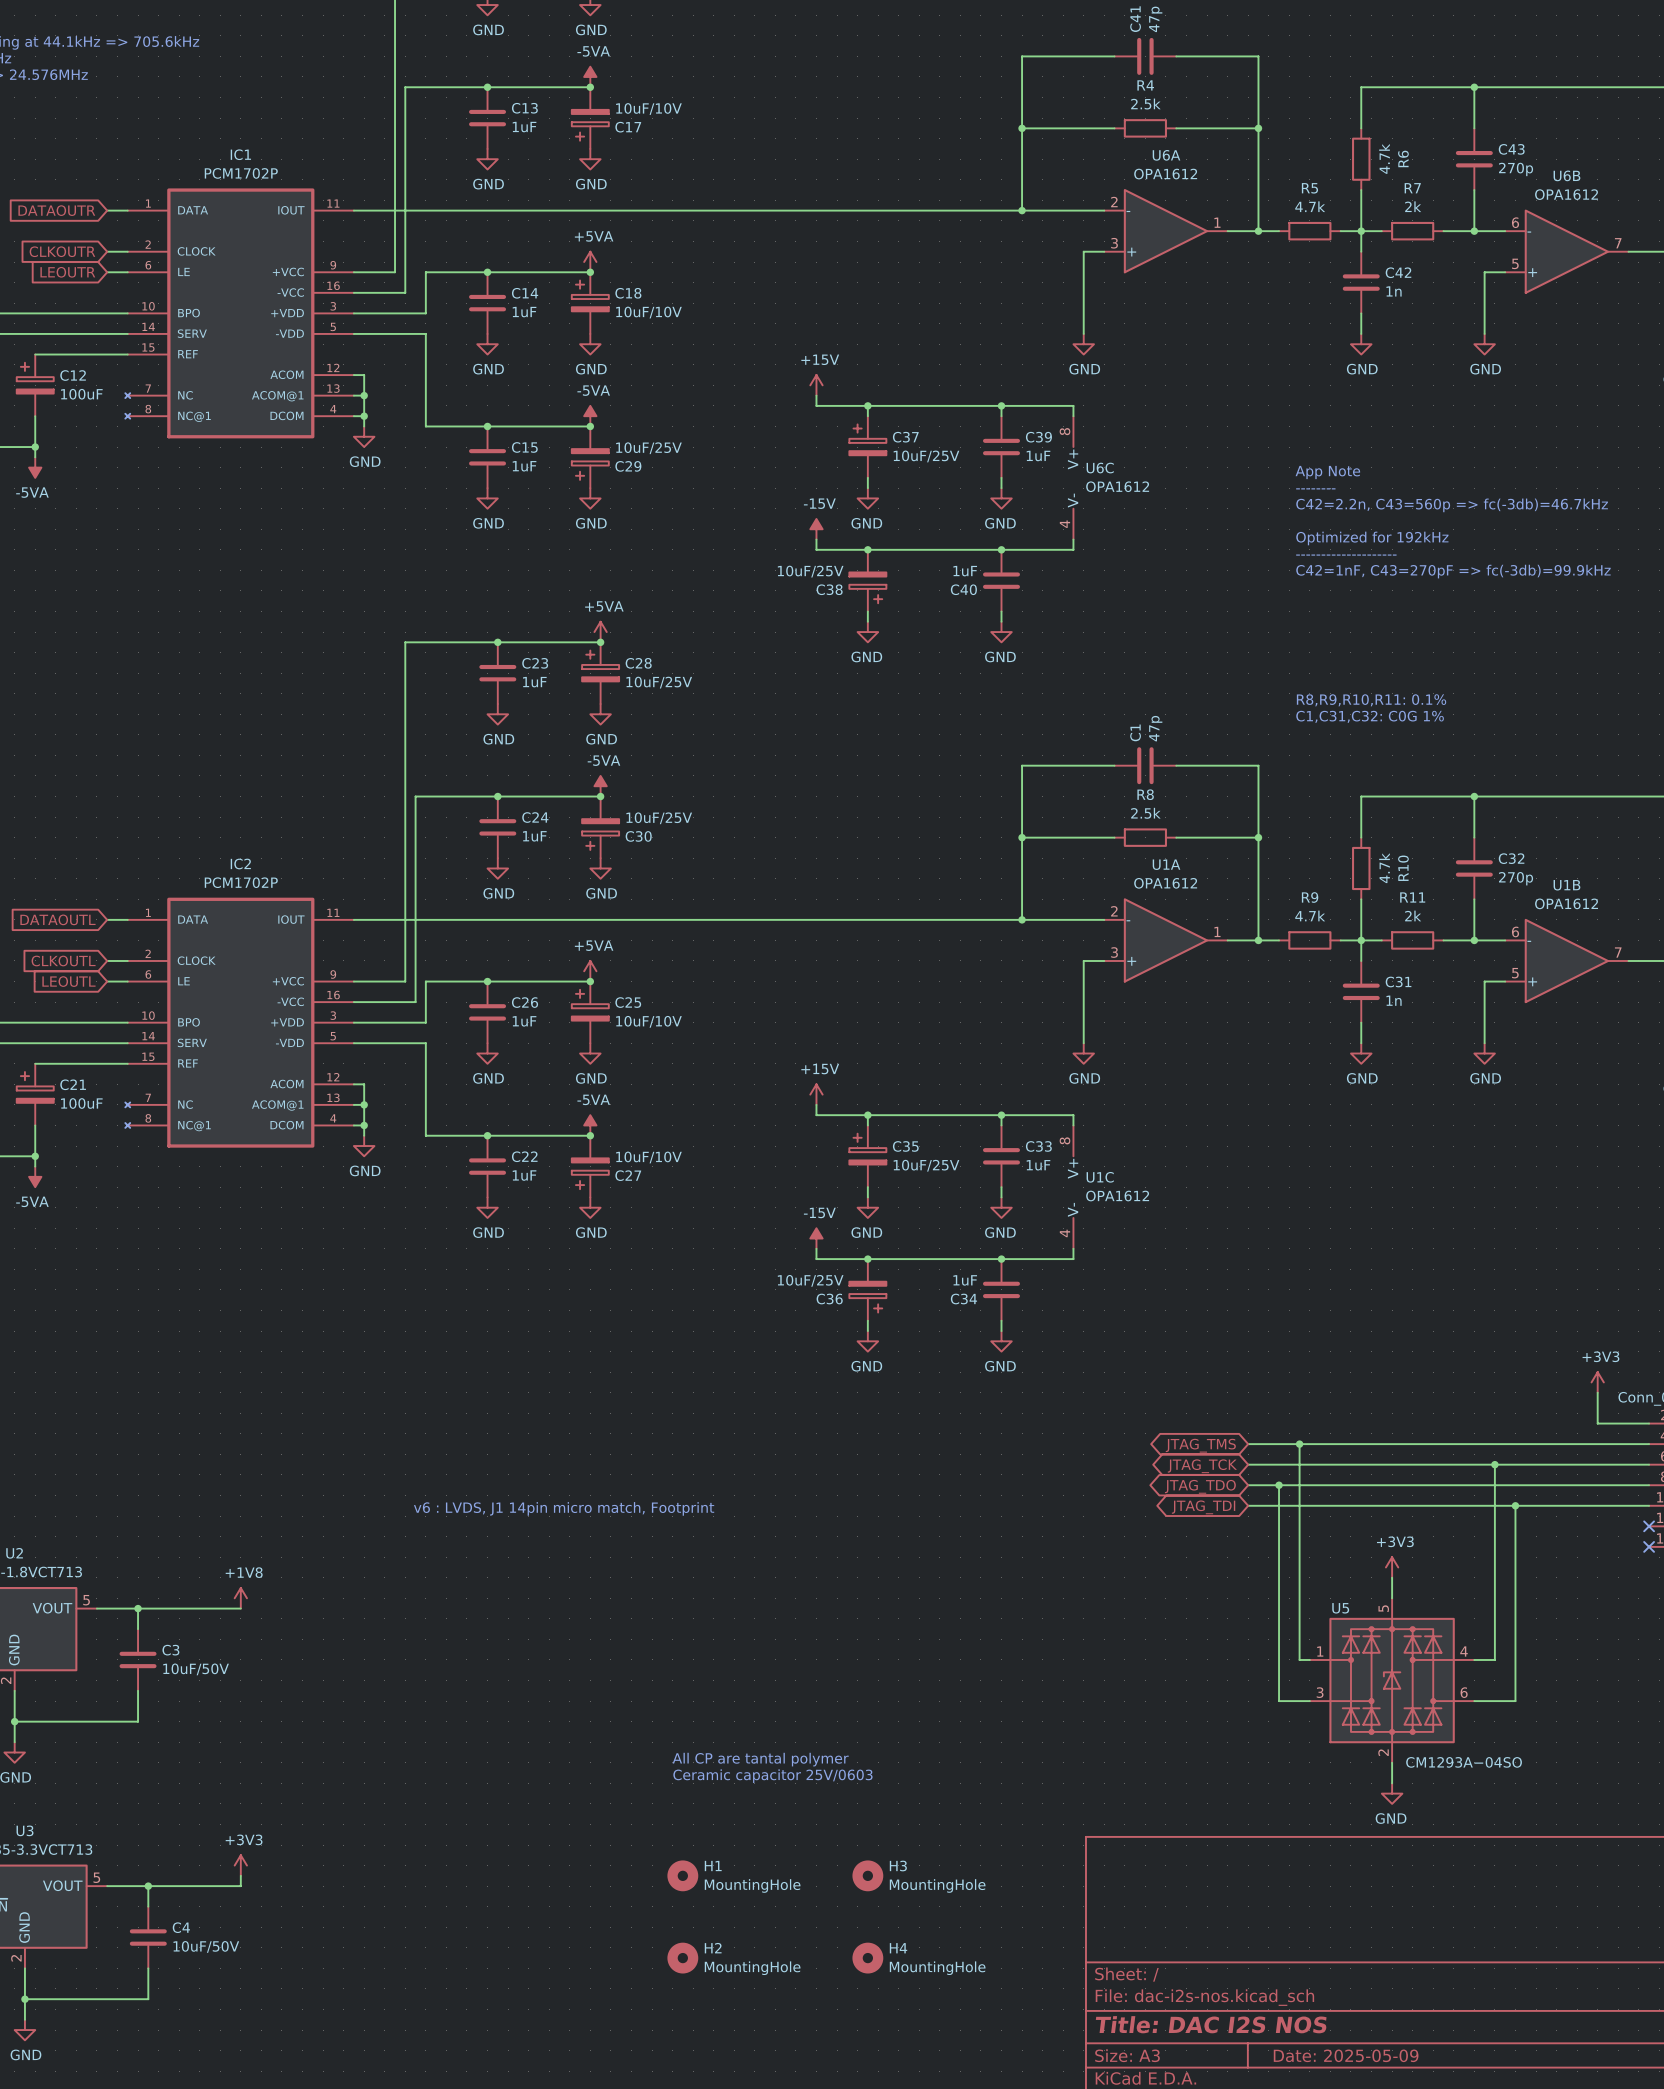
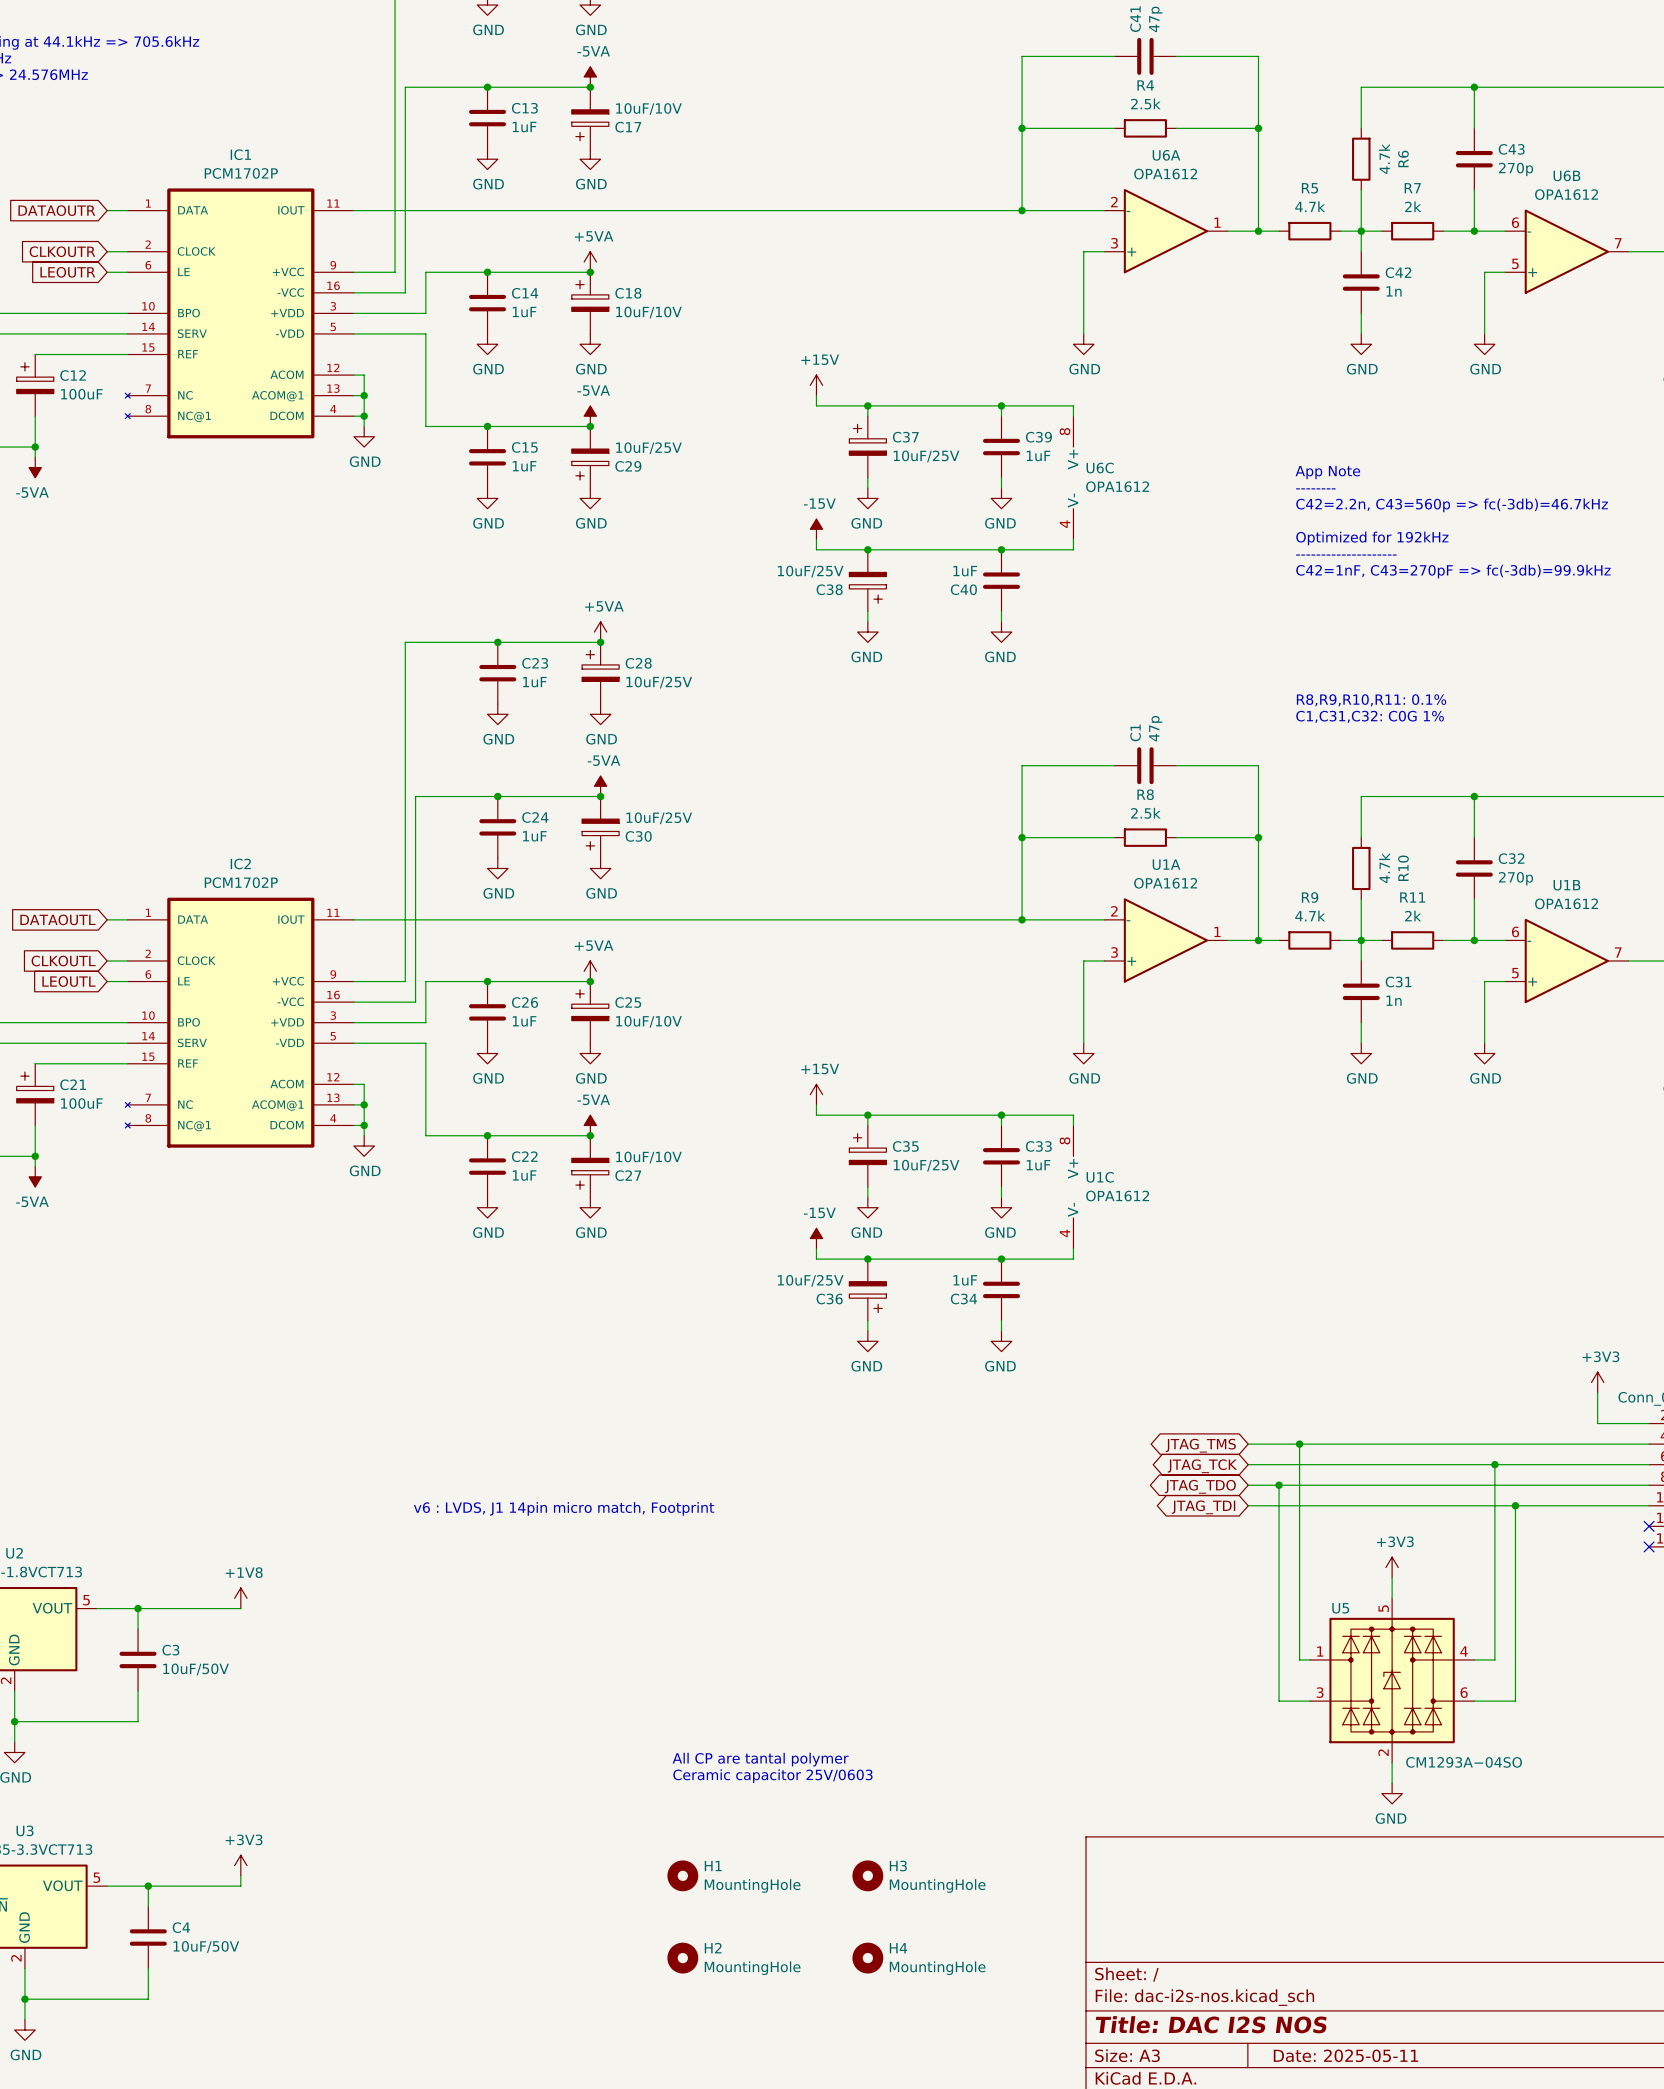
title block: Date: 2025-05-09 (1346, 2055) -> Date: 2025-05-11 (1345, 2055)

